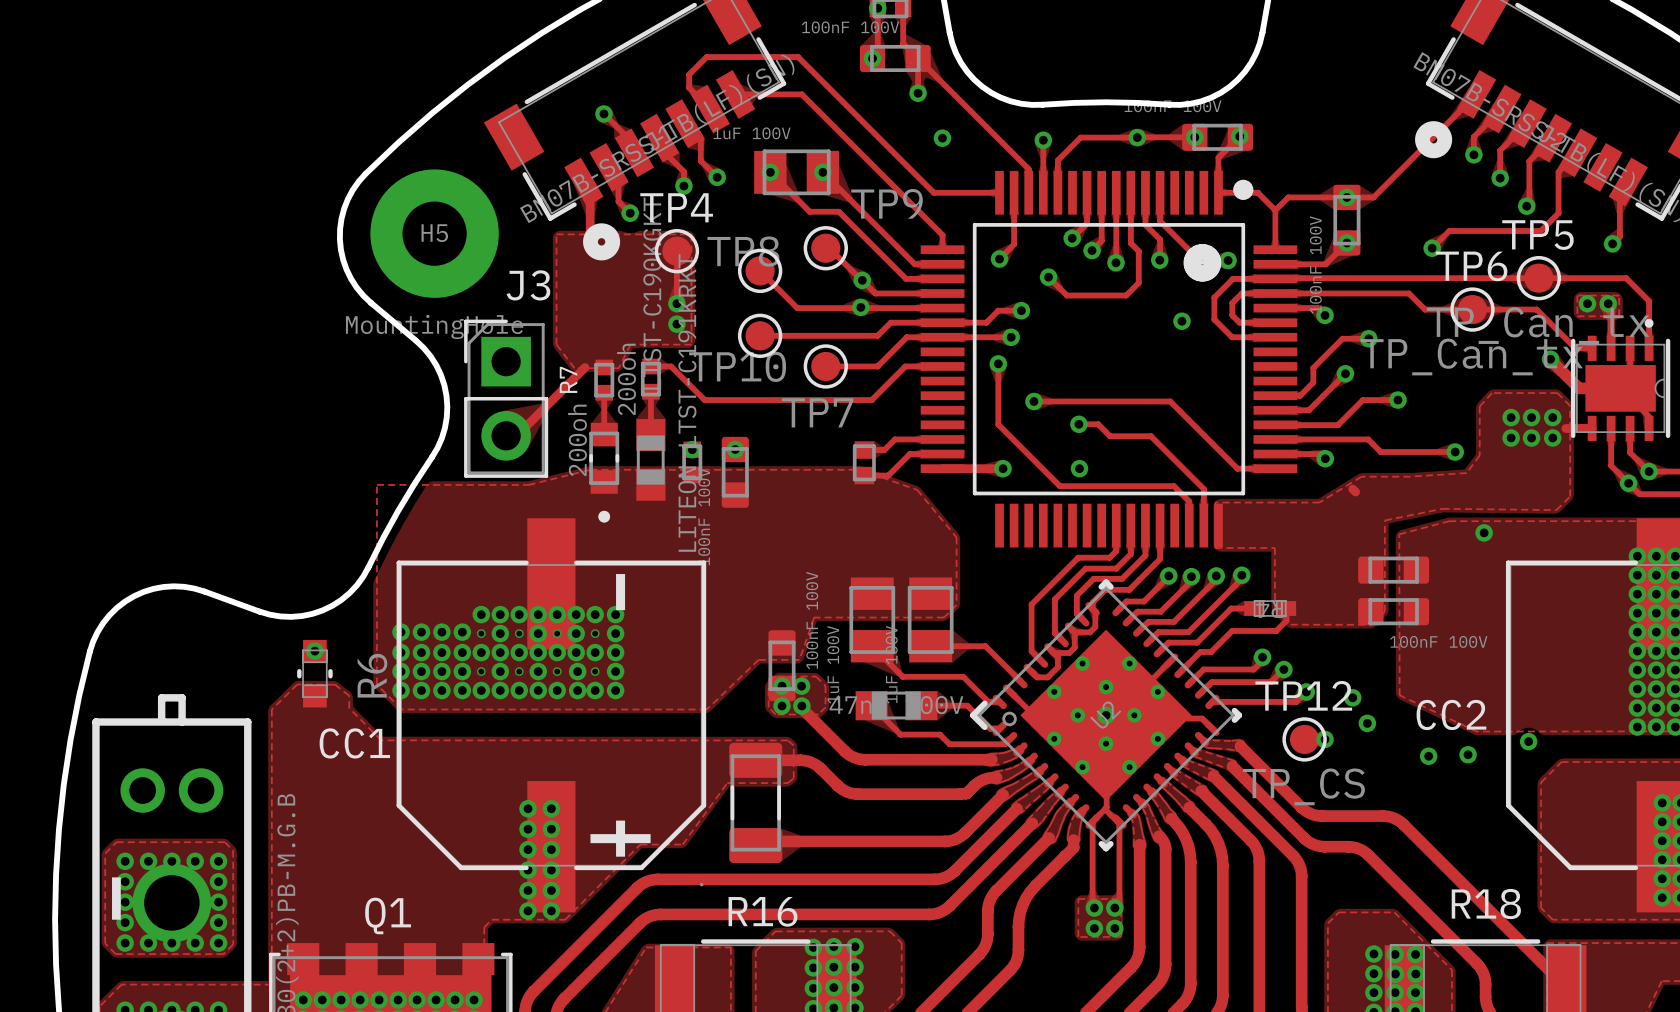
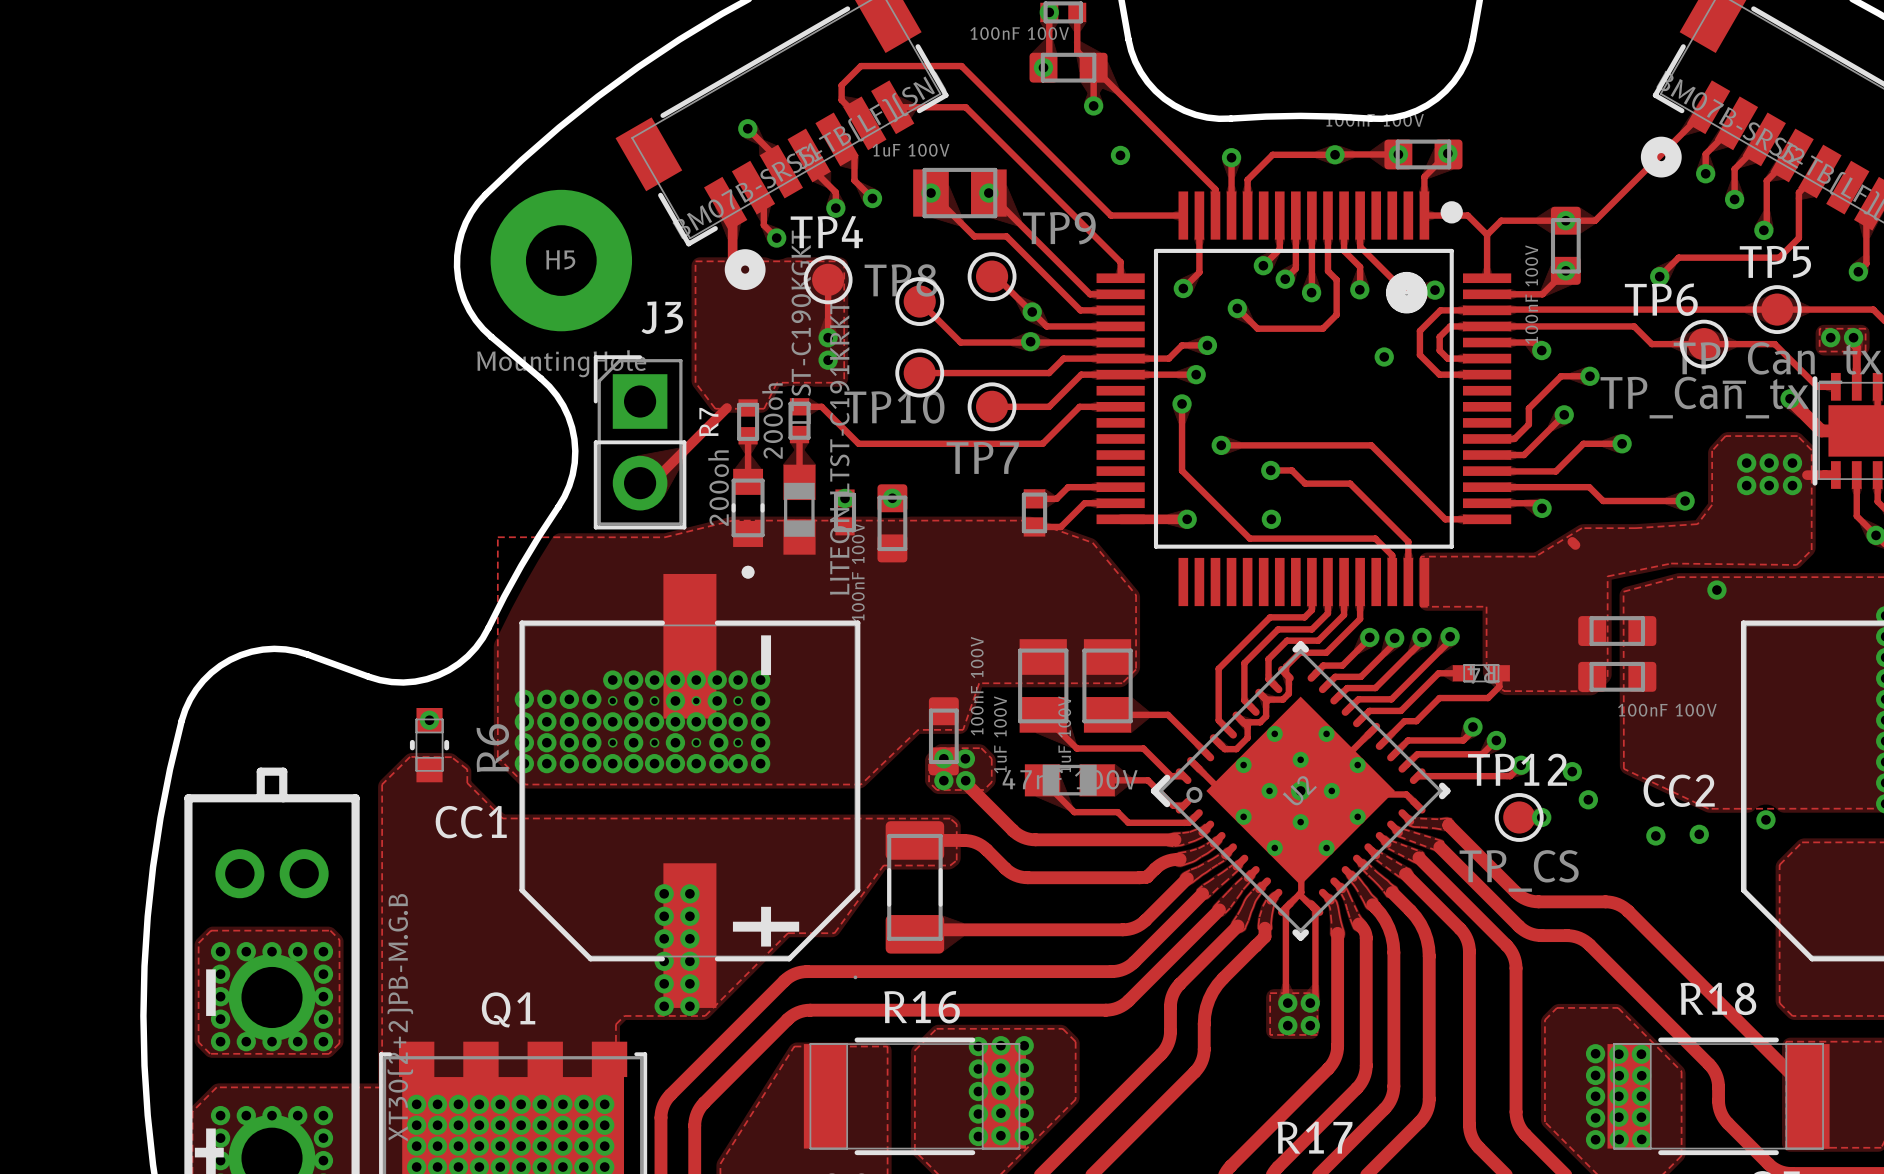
TP6 name position: TP6 (1471, 266) -> TP6 (1661, 299)

